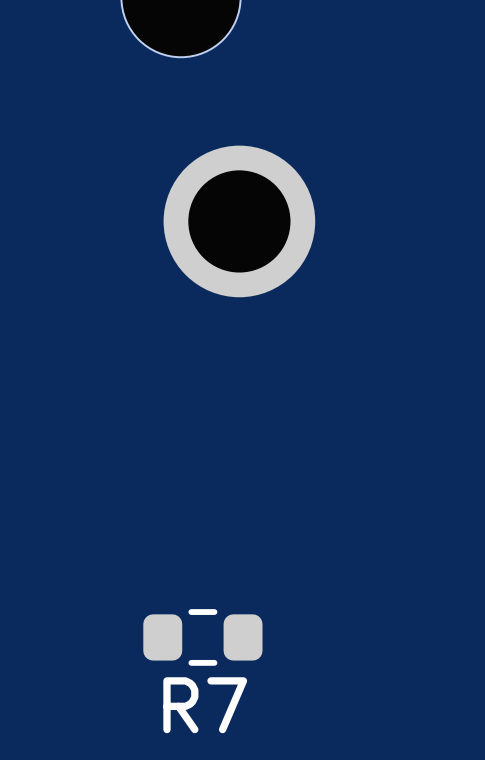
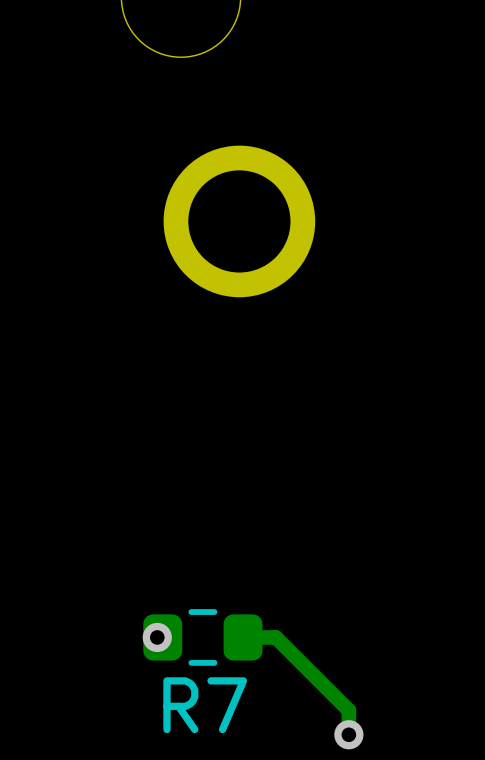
via: none -> (157, 637)
track: none -> (243, 637) (275, 637) (348, 710) (348, 734)
via: none -> (348, 734)

